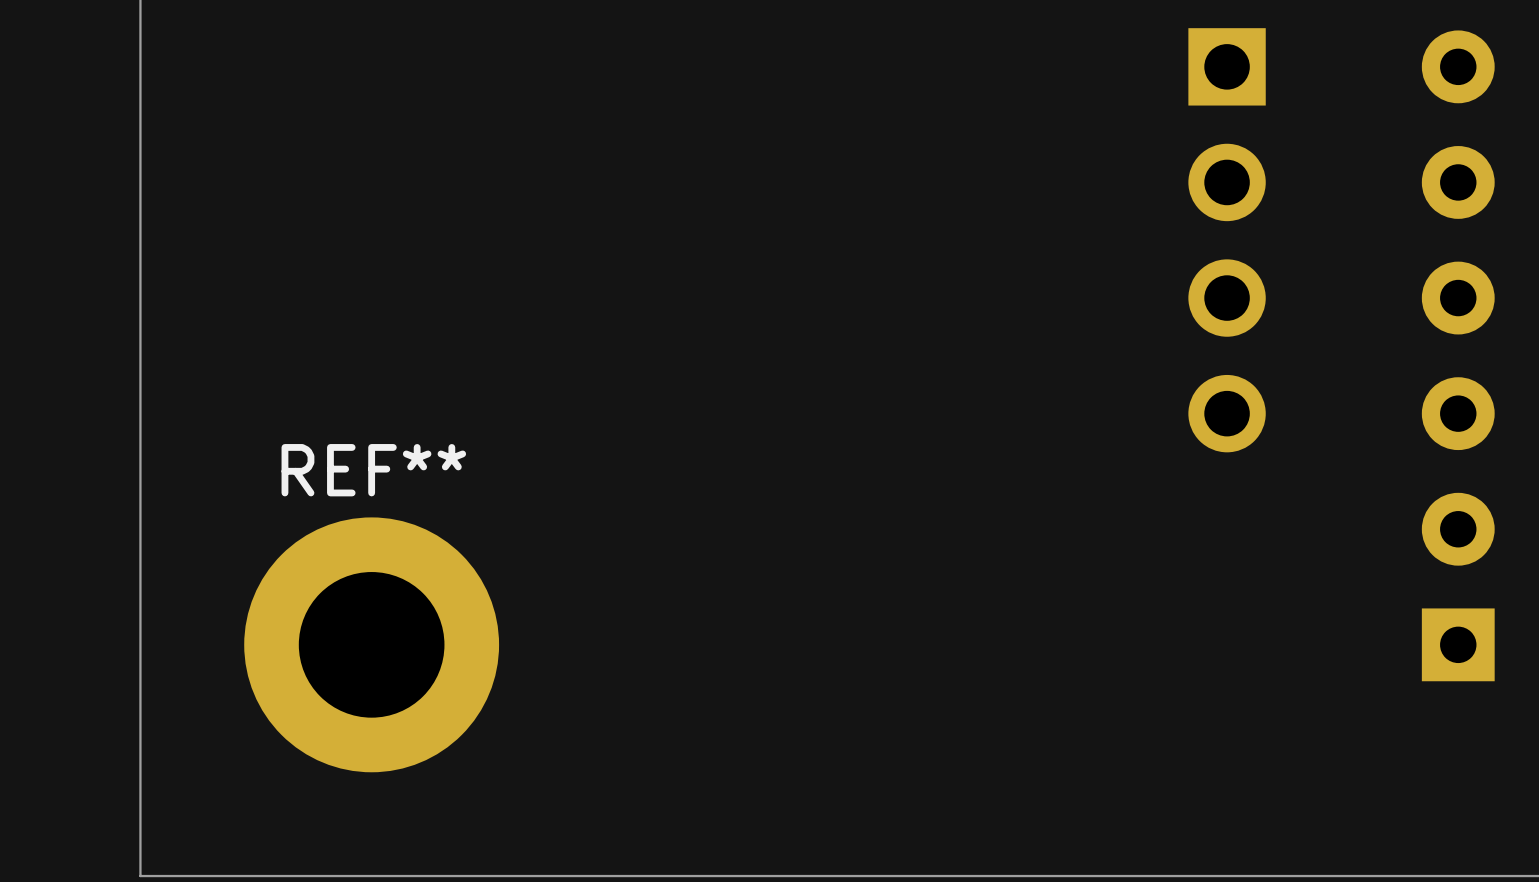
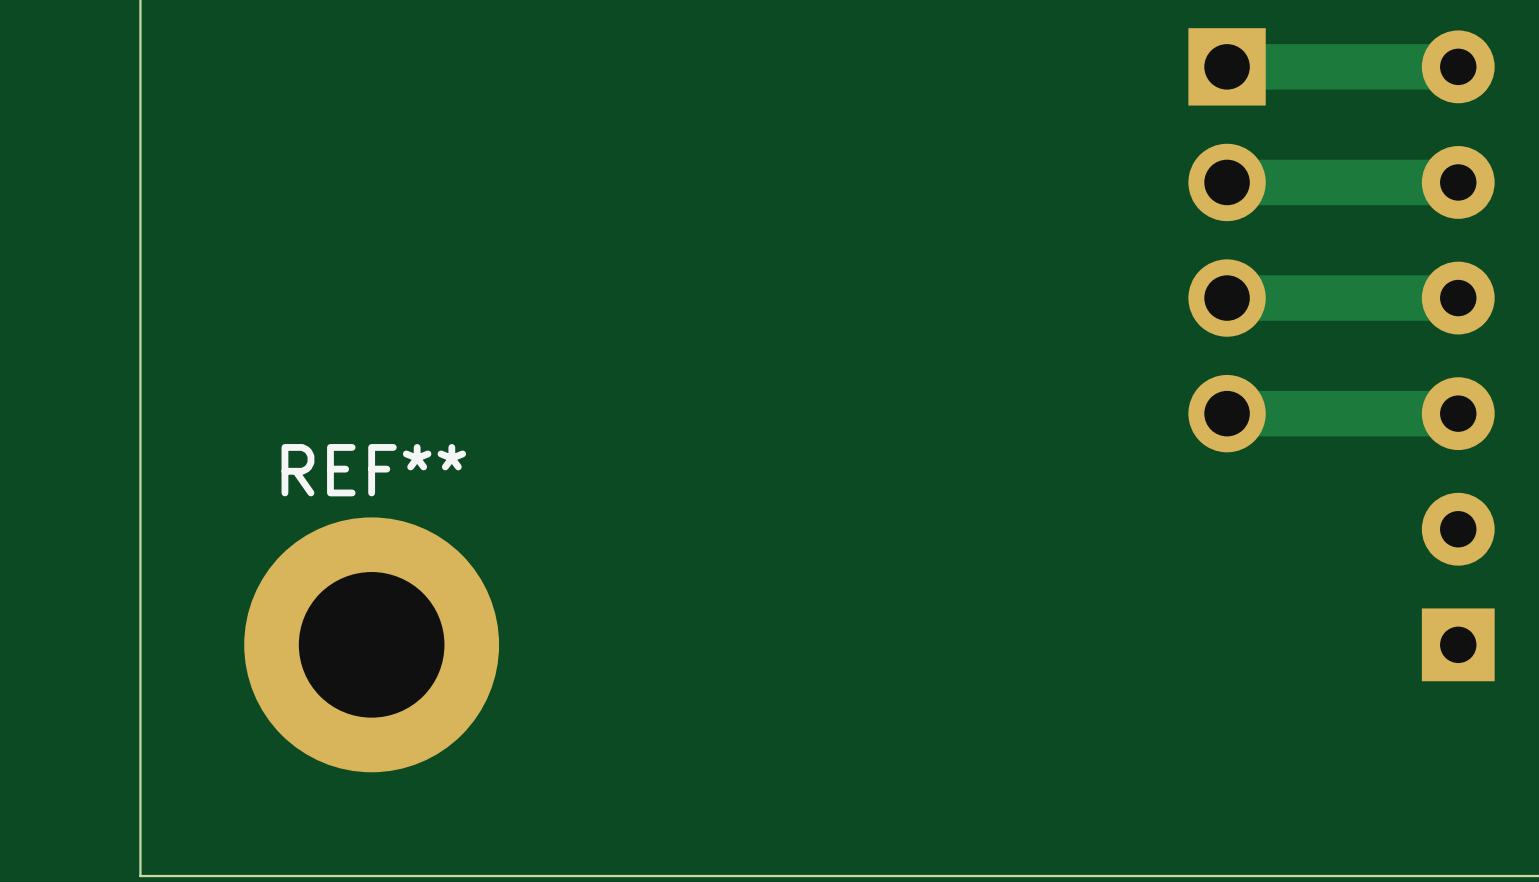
track: none -> (1227, 66) (1458, 66)
track: none -> (1227, 182) (1458, 182)
track: none -> (1227, 298) (1458, 298)
track: none -> (1227, 413) (1458, 413)

